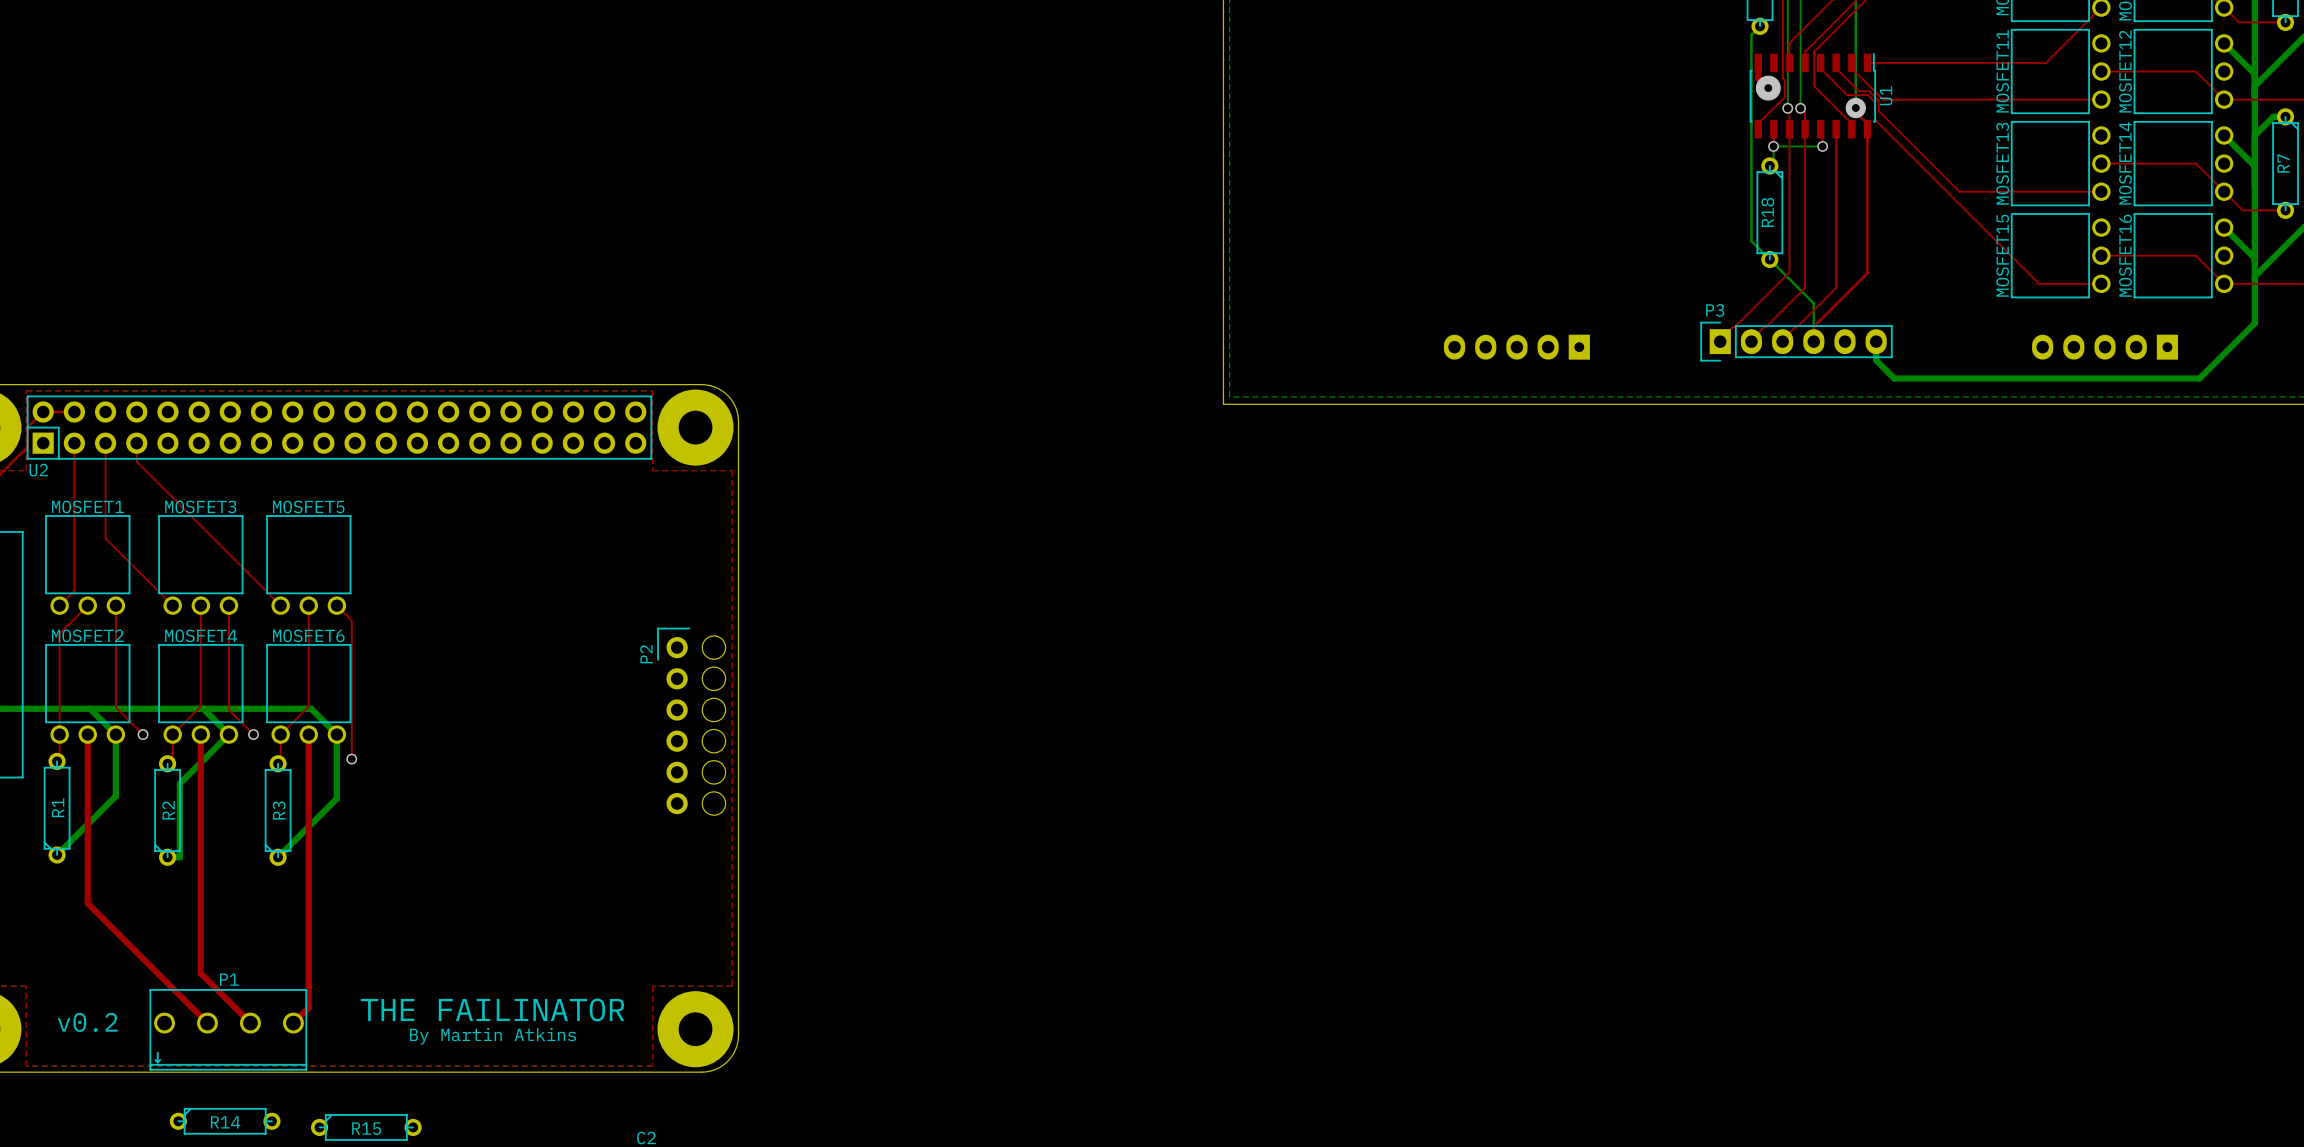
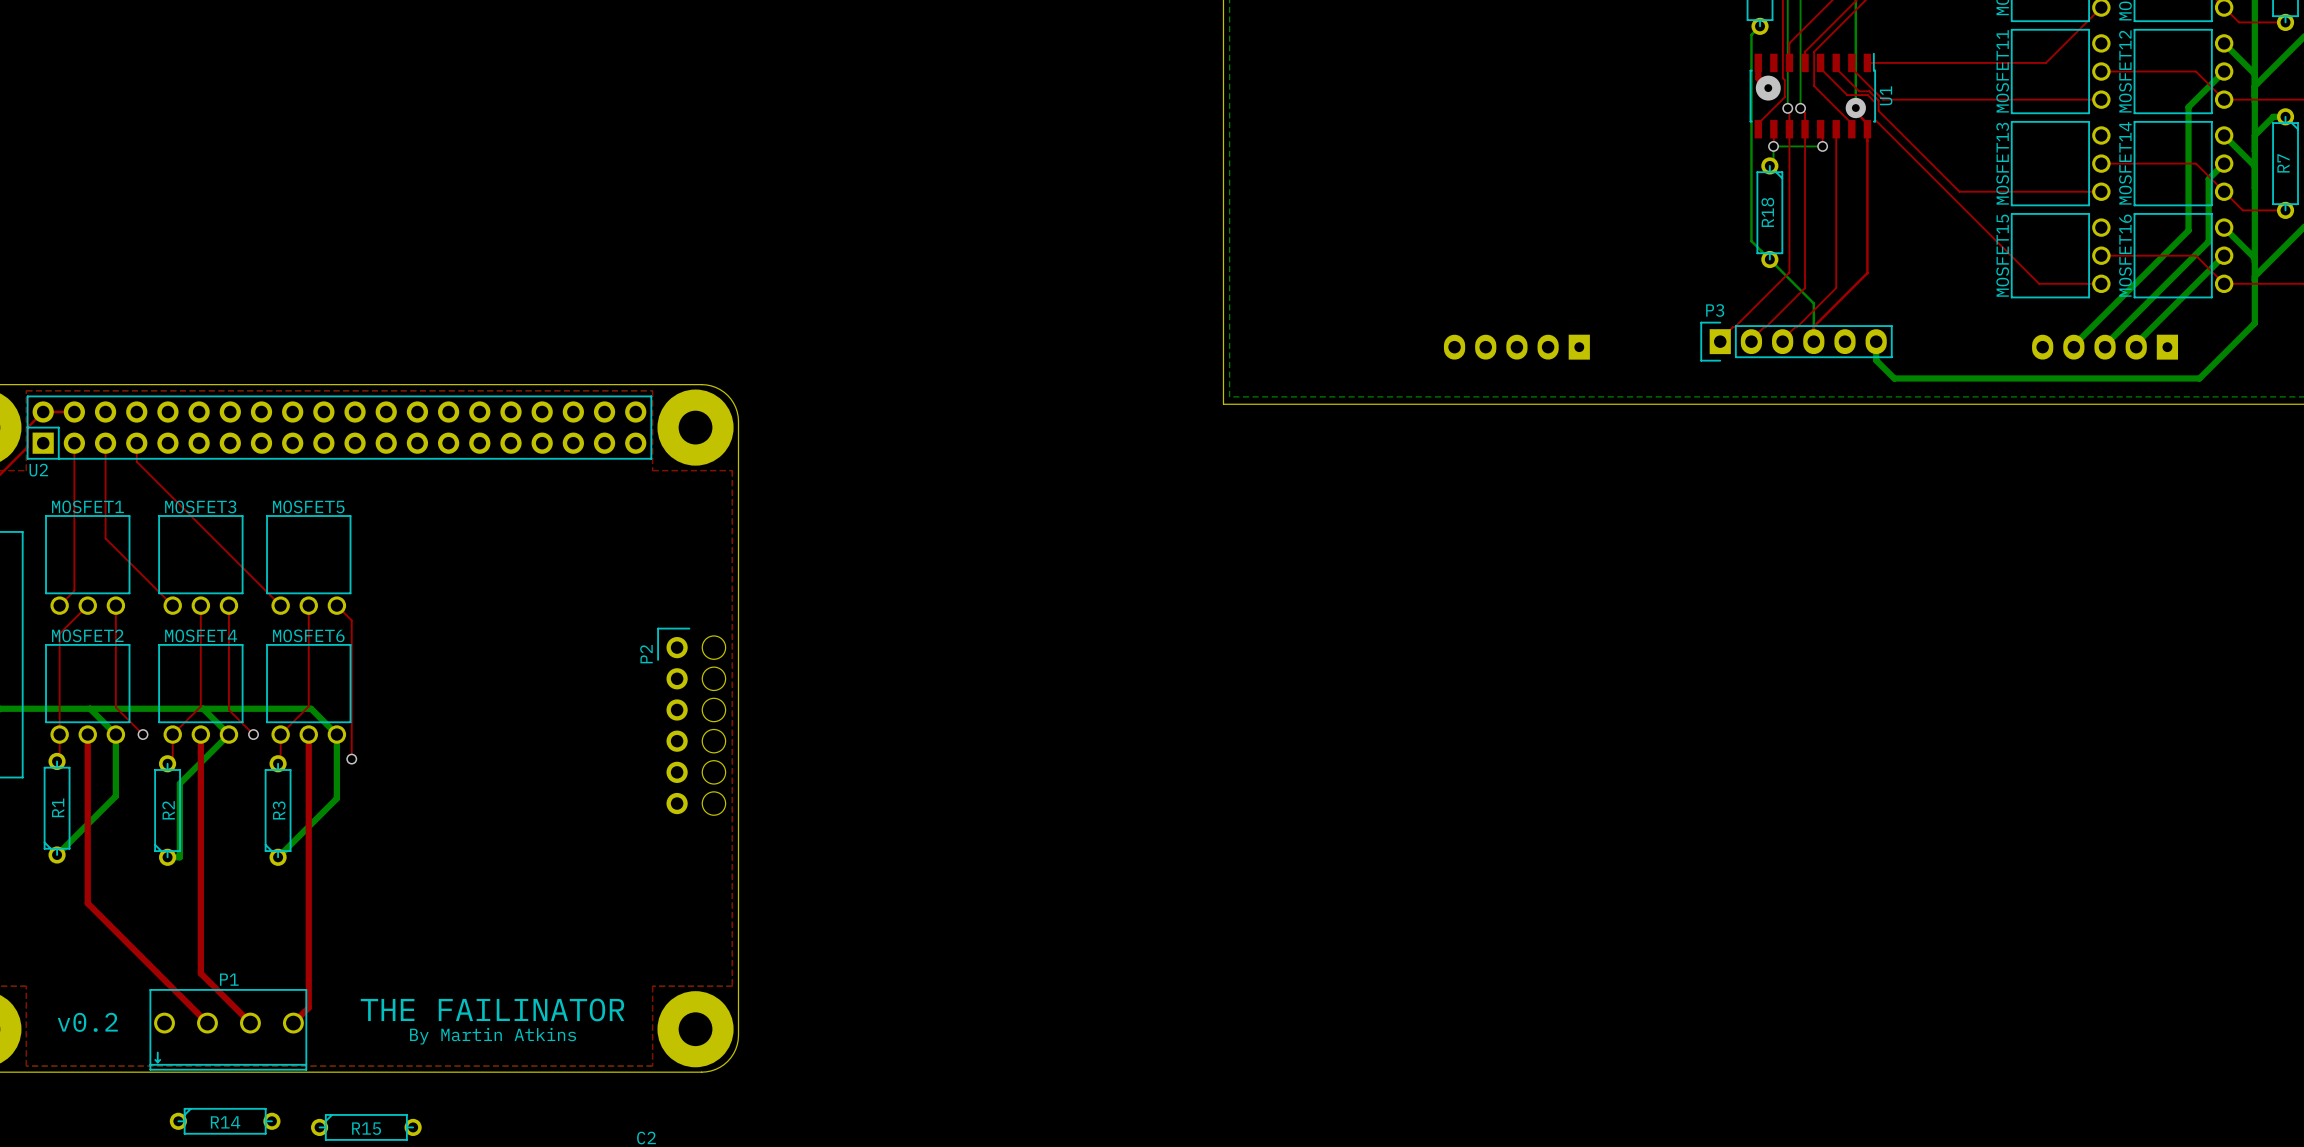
bottom track: none -> (2224, 71) (2188, 107) (2188, 230) (2073, 347)
bottom track: none -> (2224, 163) (2208, 179) (2208, 241) (2105, 347)
bottom track: none -> (2224, 255) (2136, 343) (2136, 347)

